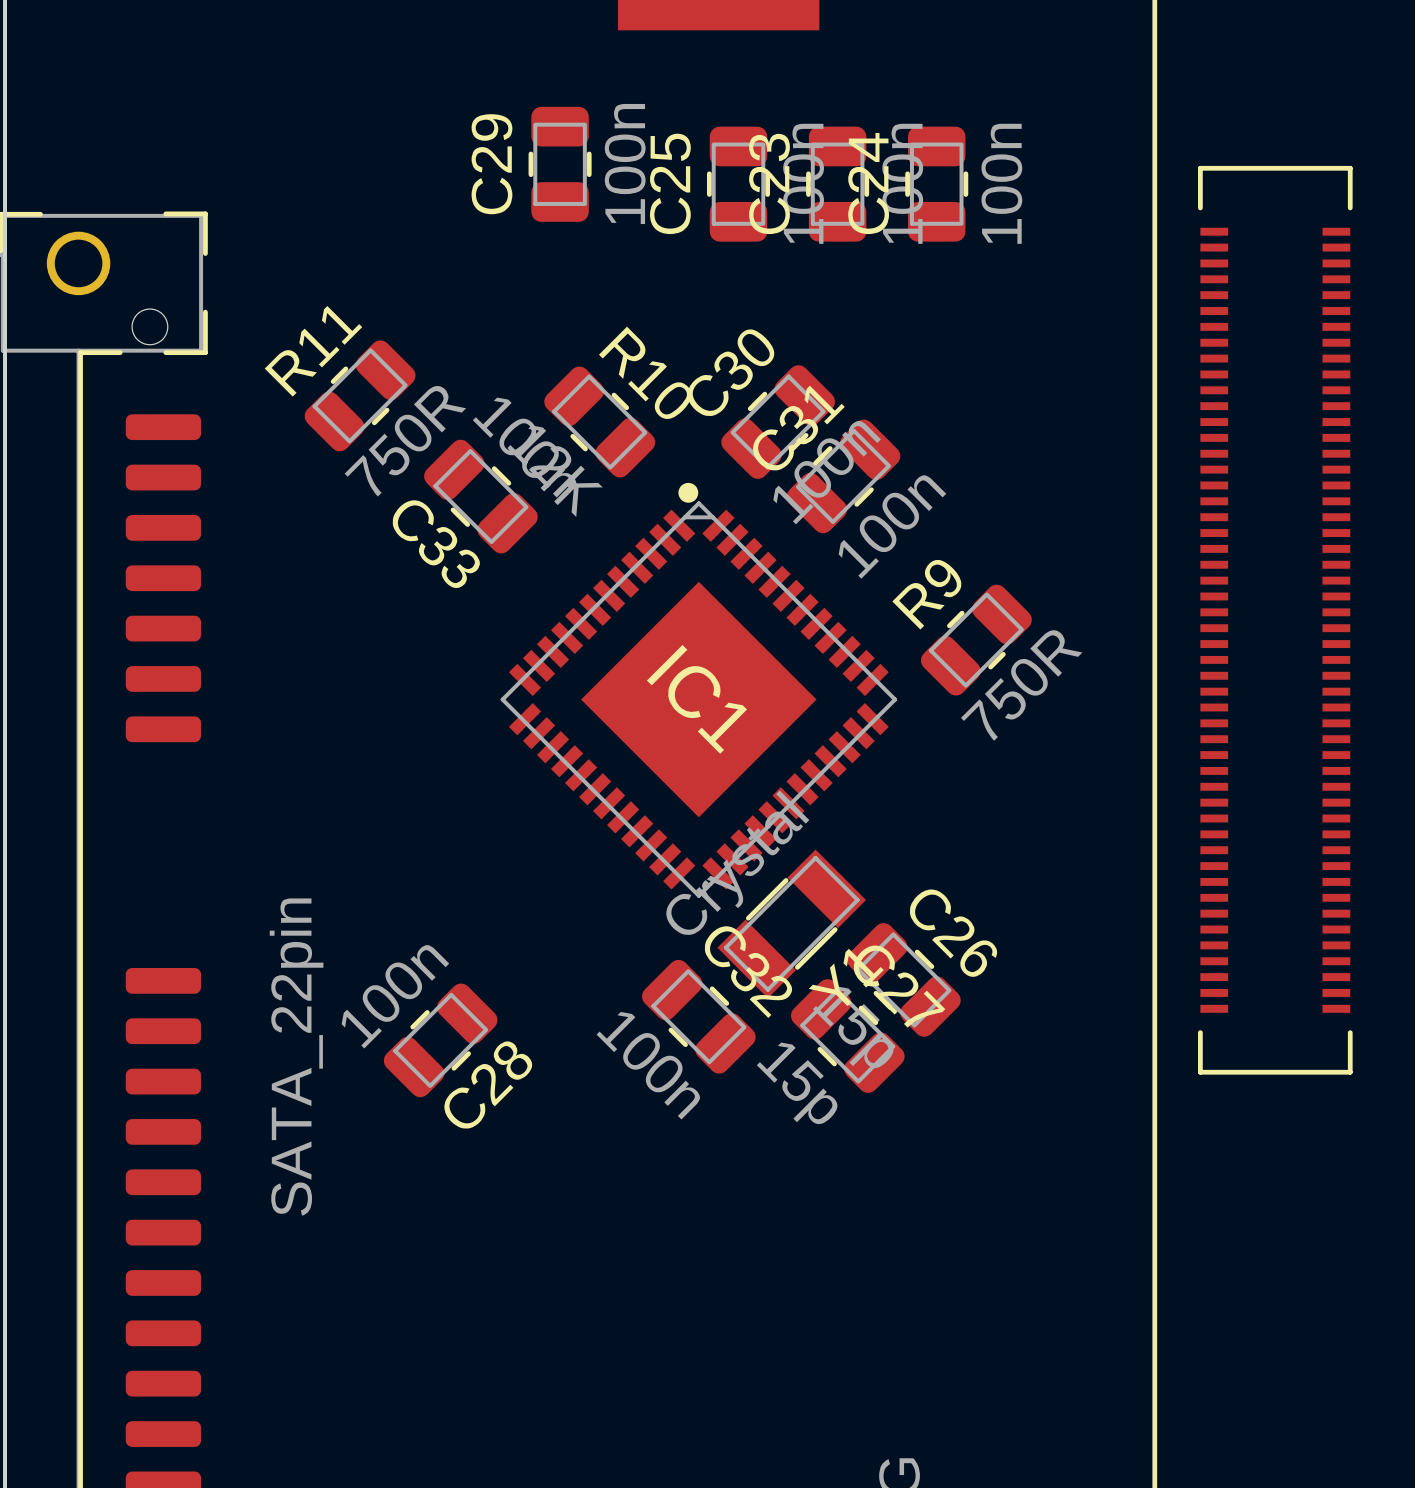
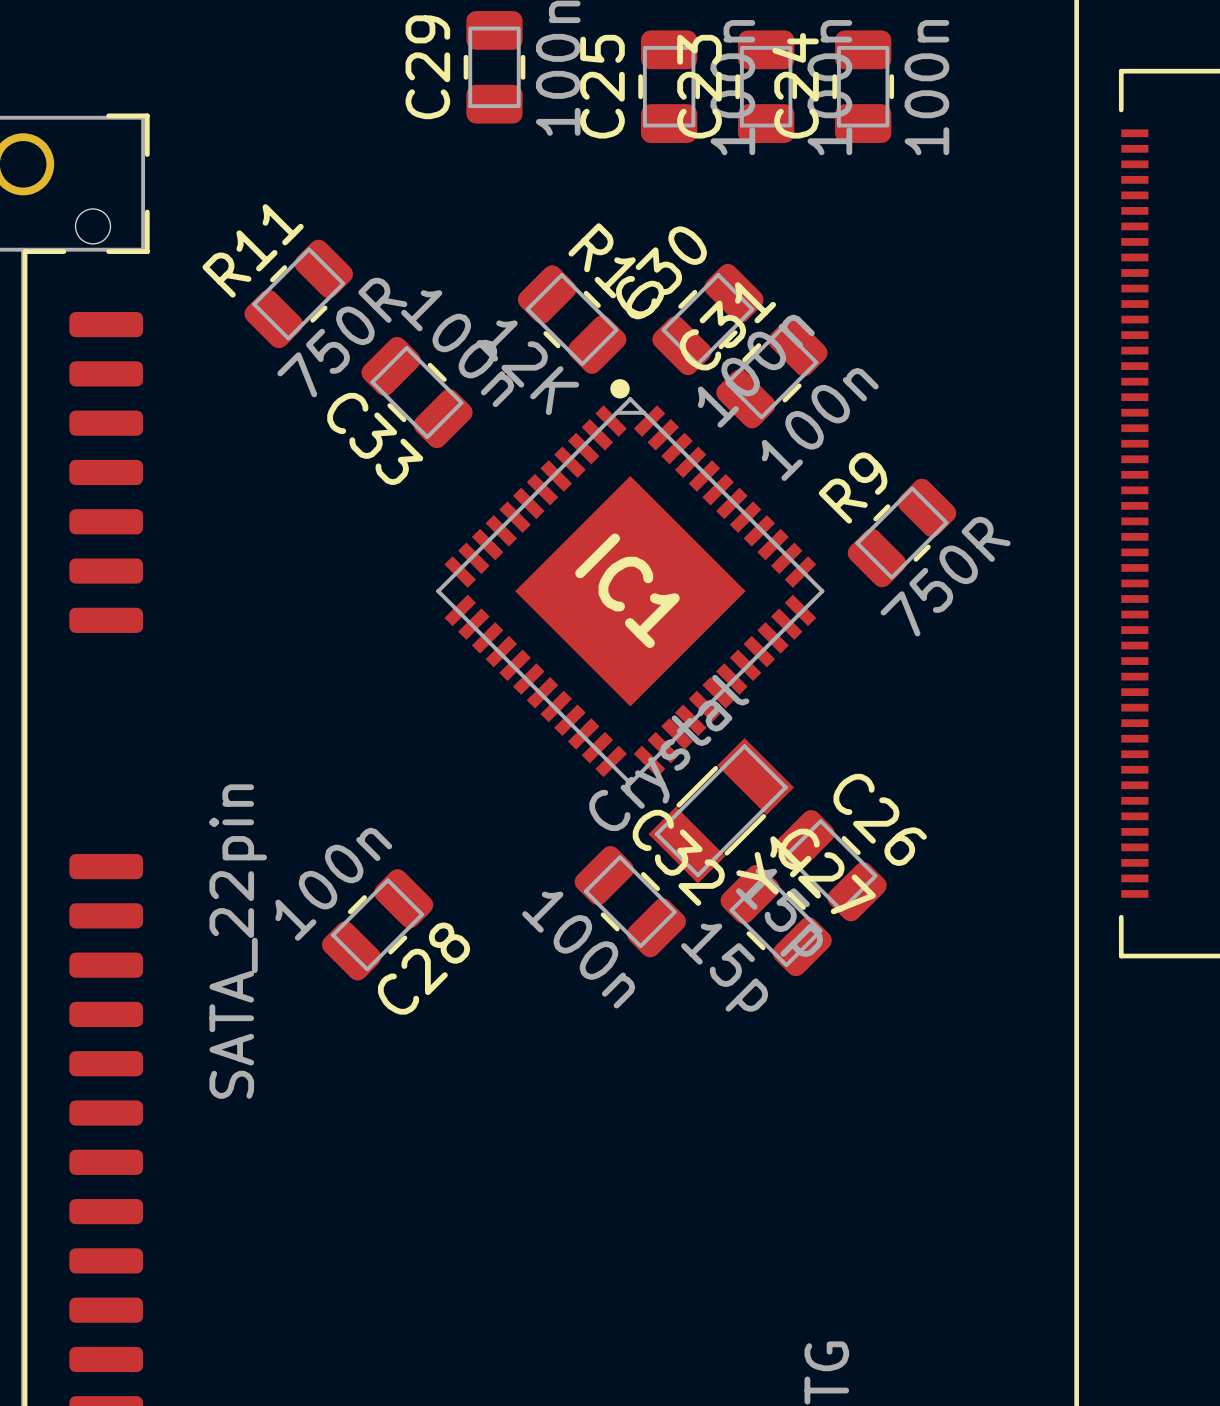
R10 position: (599, 422) -> (572, 319)

